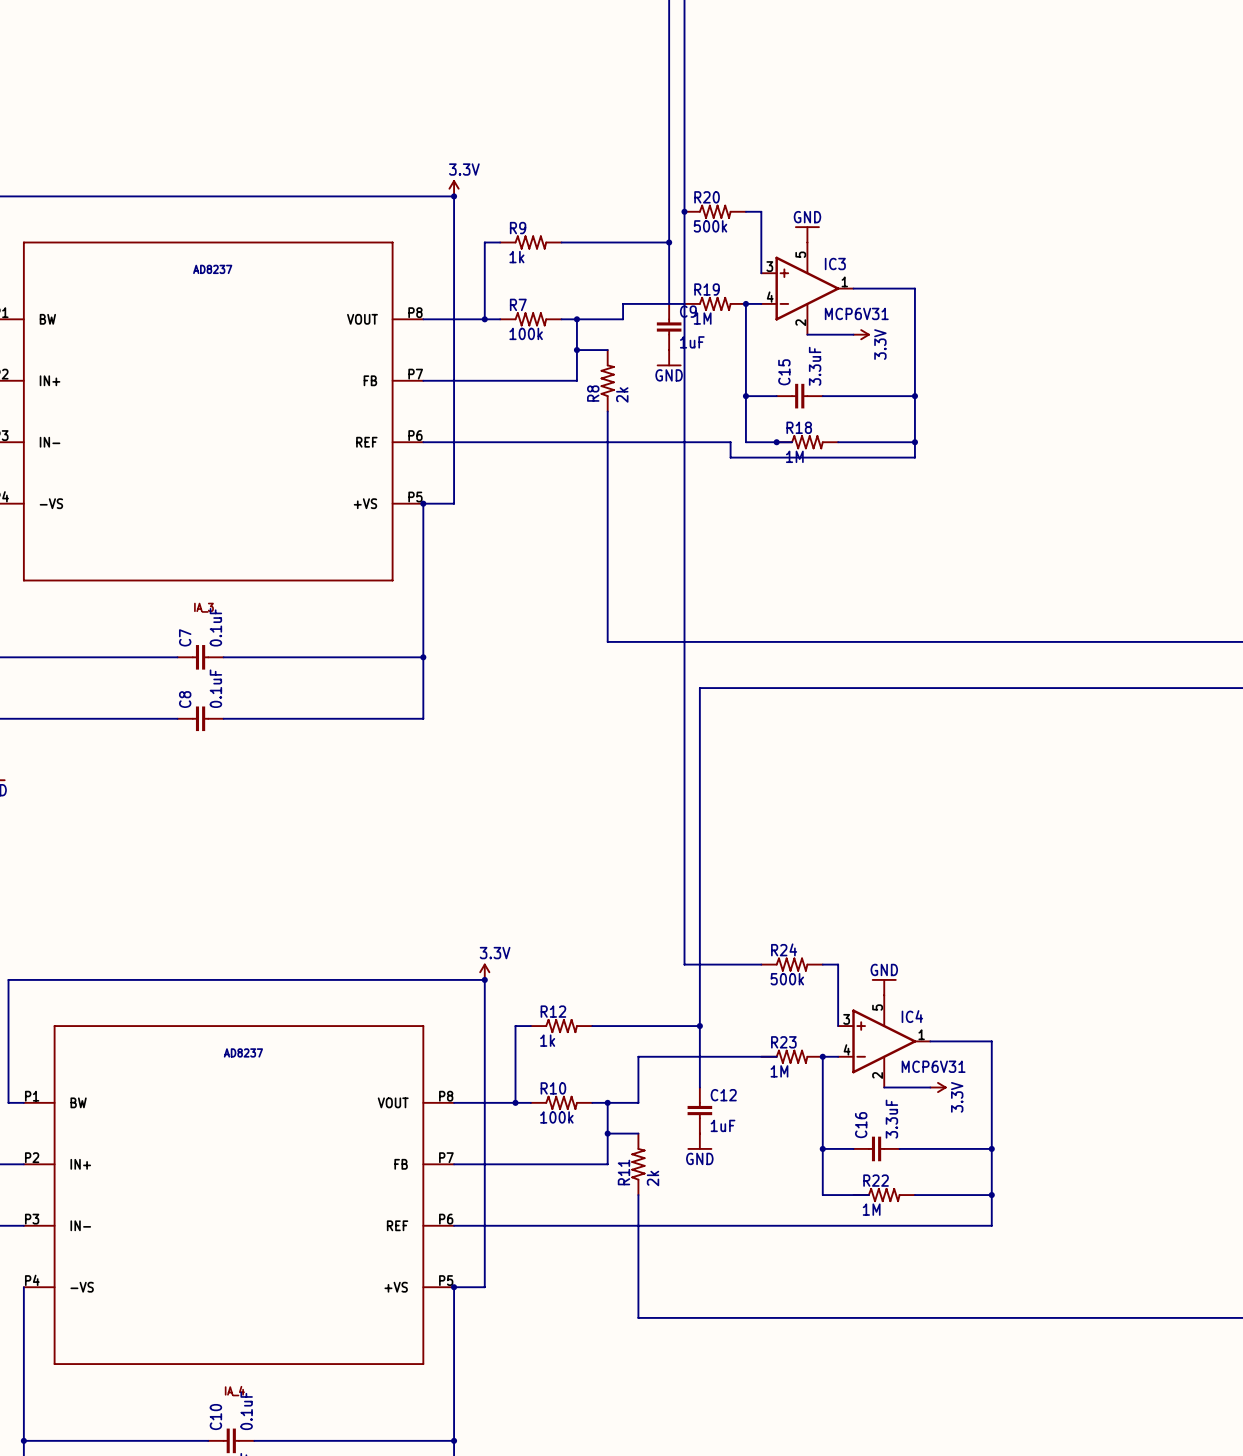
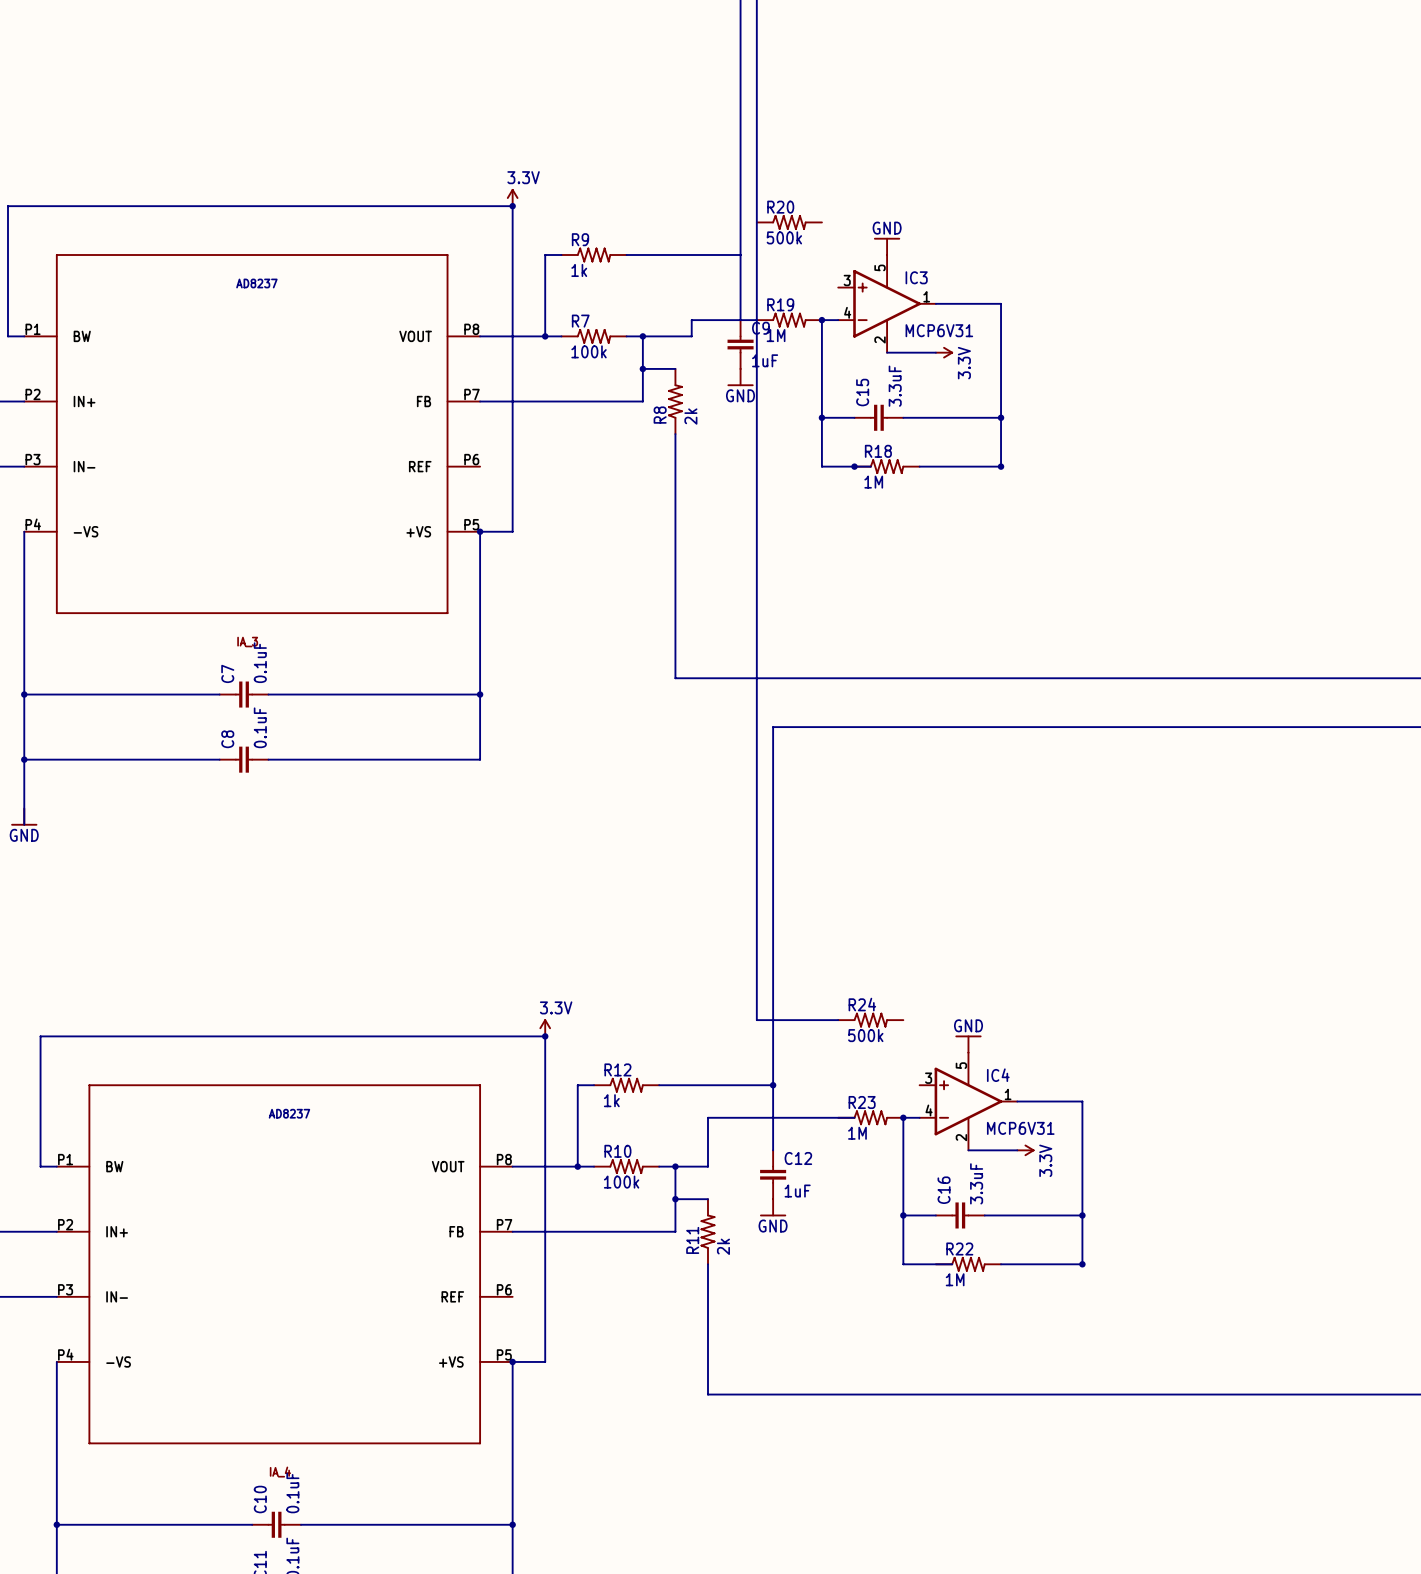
junction: (684, 211) -> none
wire: (745, 211) (761, 211) (761, 273) -> none
junction: (669, 242) -> none
wire: (423, 442) (730, 442) (730, 457) (914, 457) (914, 442) -> none
wire: (822, 964) (838, 964) (838, 1026) -> none
wire: (991, 1195) (991, 1225) (454, 1225) -> none

